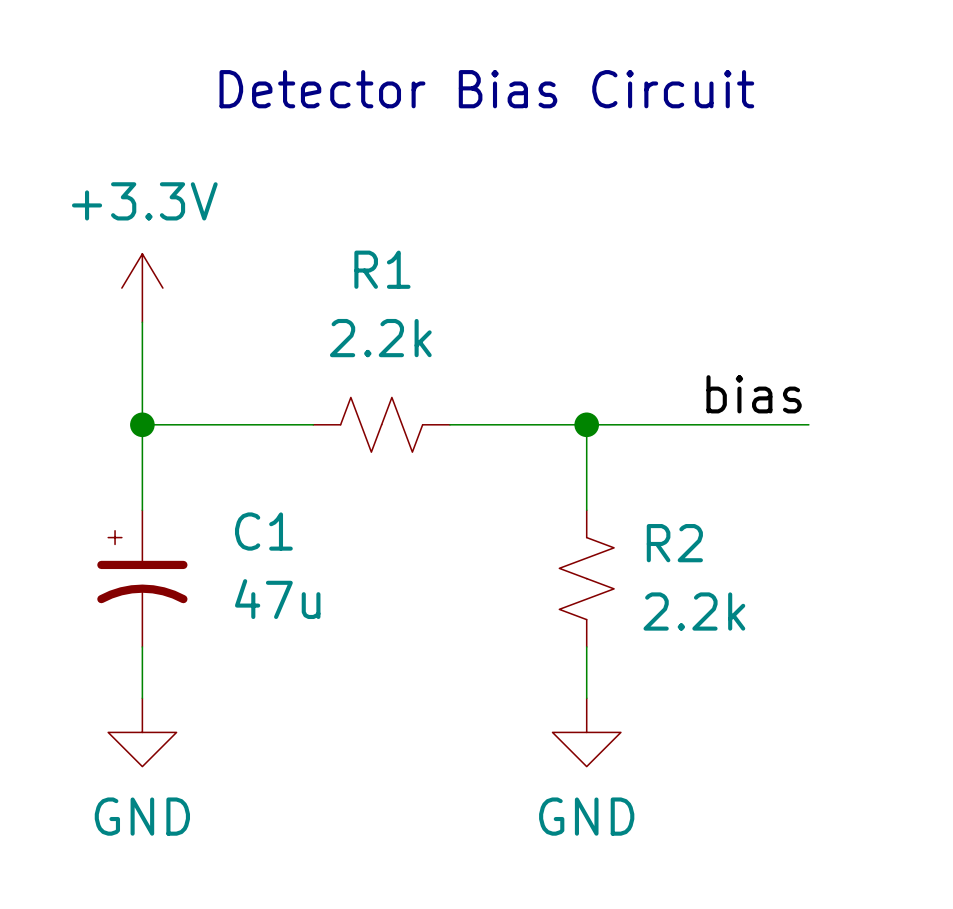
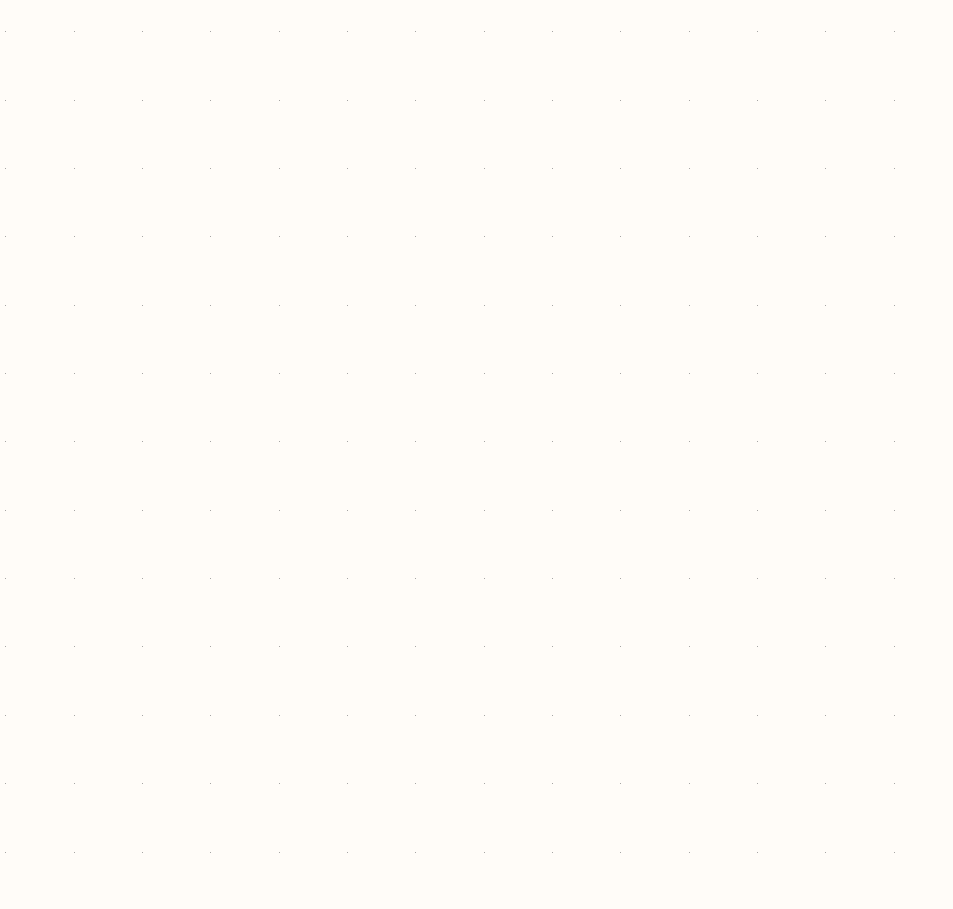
text: Detector Bias Circuit (486, 89) -> none
power symbol: +3.3V (142, 288) -> none
wire: (142, 322) (142, 510) -> none
label: bias (754, 394) -> none
wire: (142, 424) (313, 424) -> none
junction: (142, 424) -> none
R1: 2.2k (381, 424) -> none
wire: (449, 424) (808, 424) -> none
wire: (586, 424) (586, 510) -> none
junction: (586, 424) -> none
C1: 47u (142, 578) -> none
R2: 2.2k (586, 578) -> none
wire: (142, 646) (142, 698) -> none
wire: (586, 646) (586, 698) -> none
power symbol: GND (142, 732) -> none
power symbol: GND (586, 732) -> none

